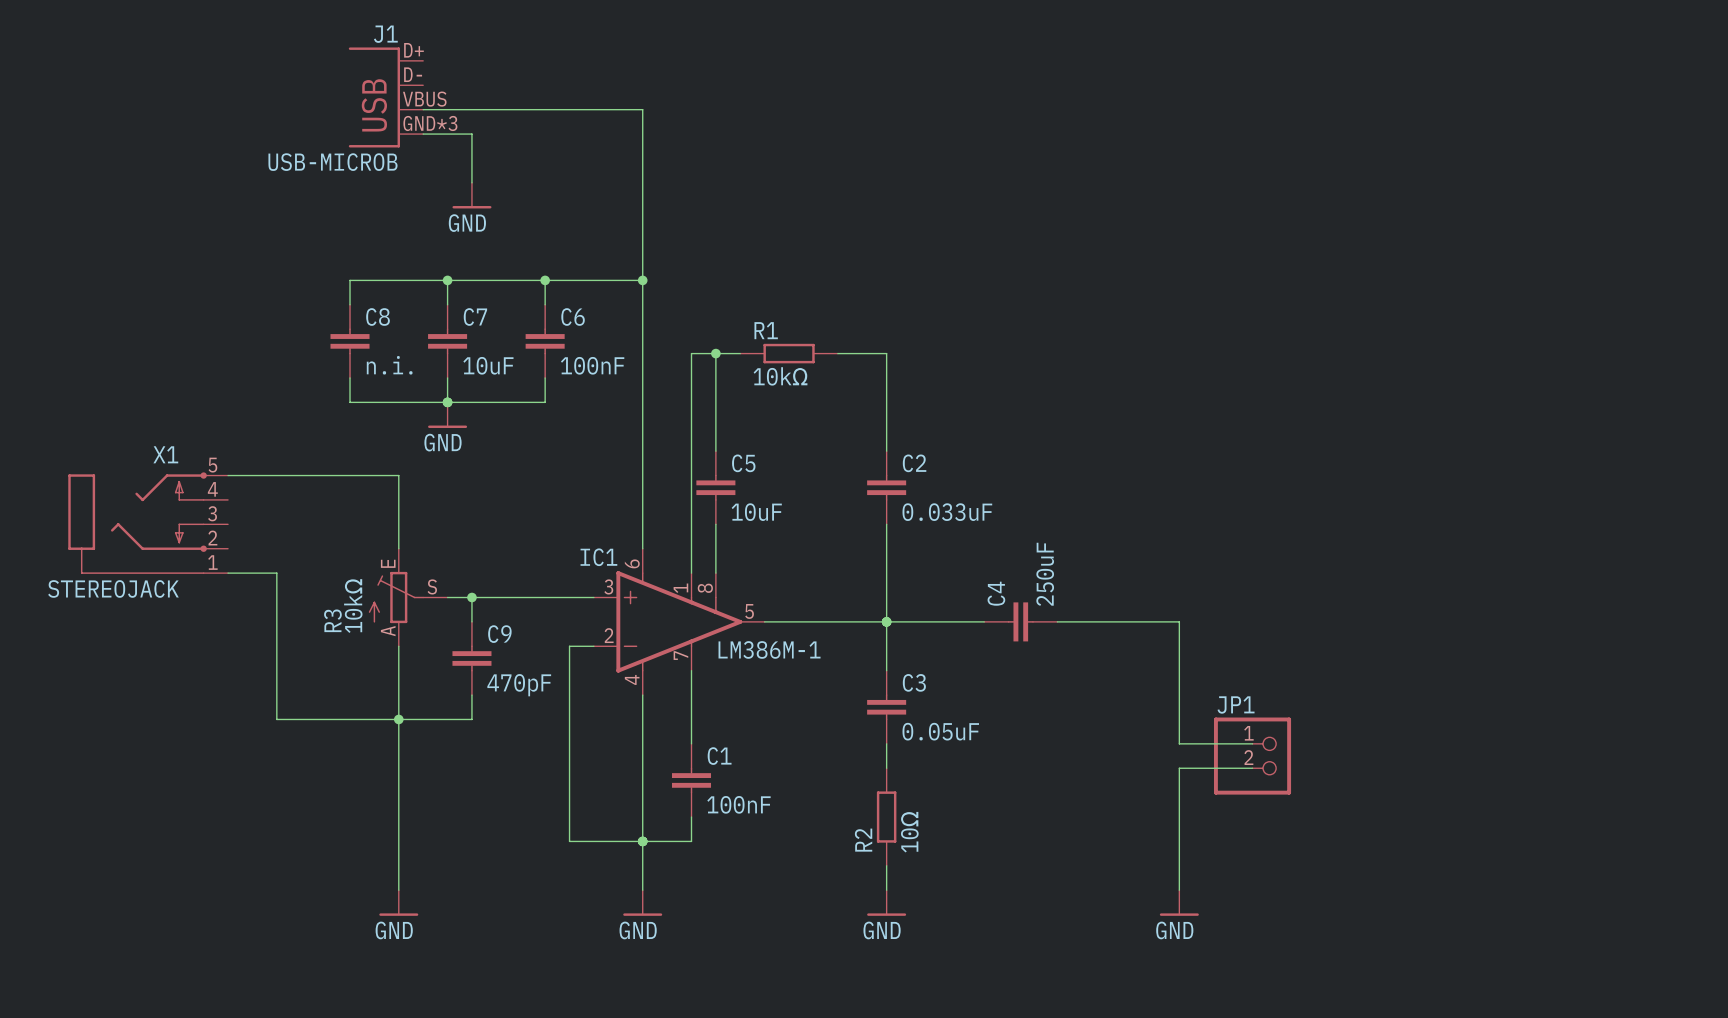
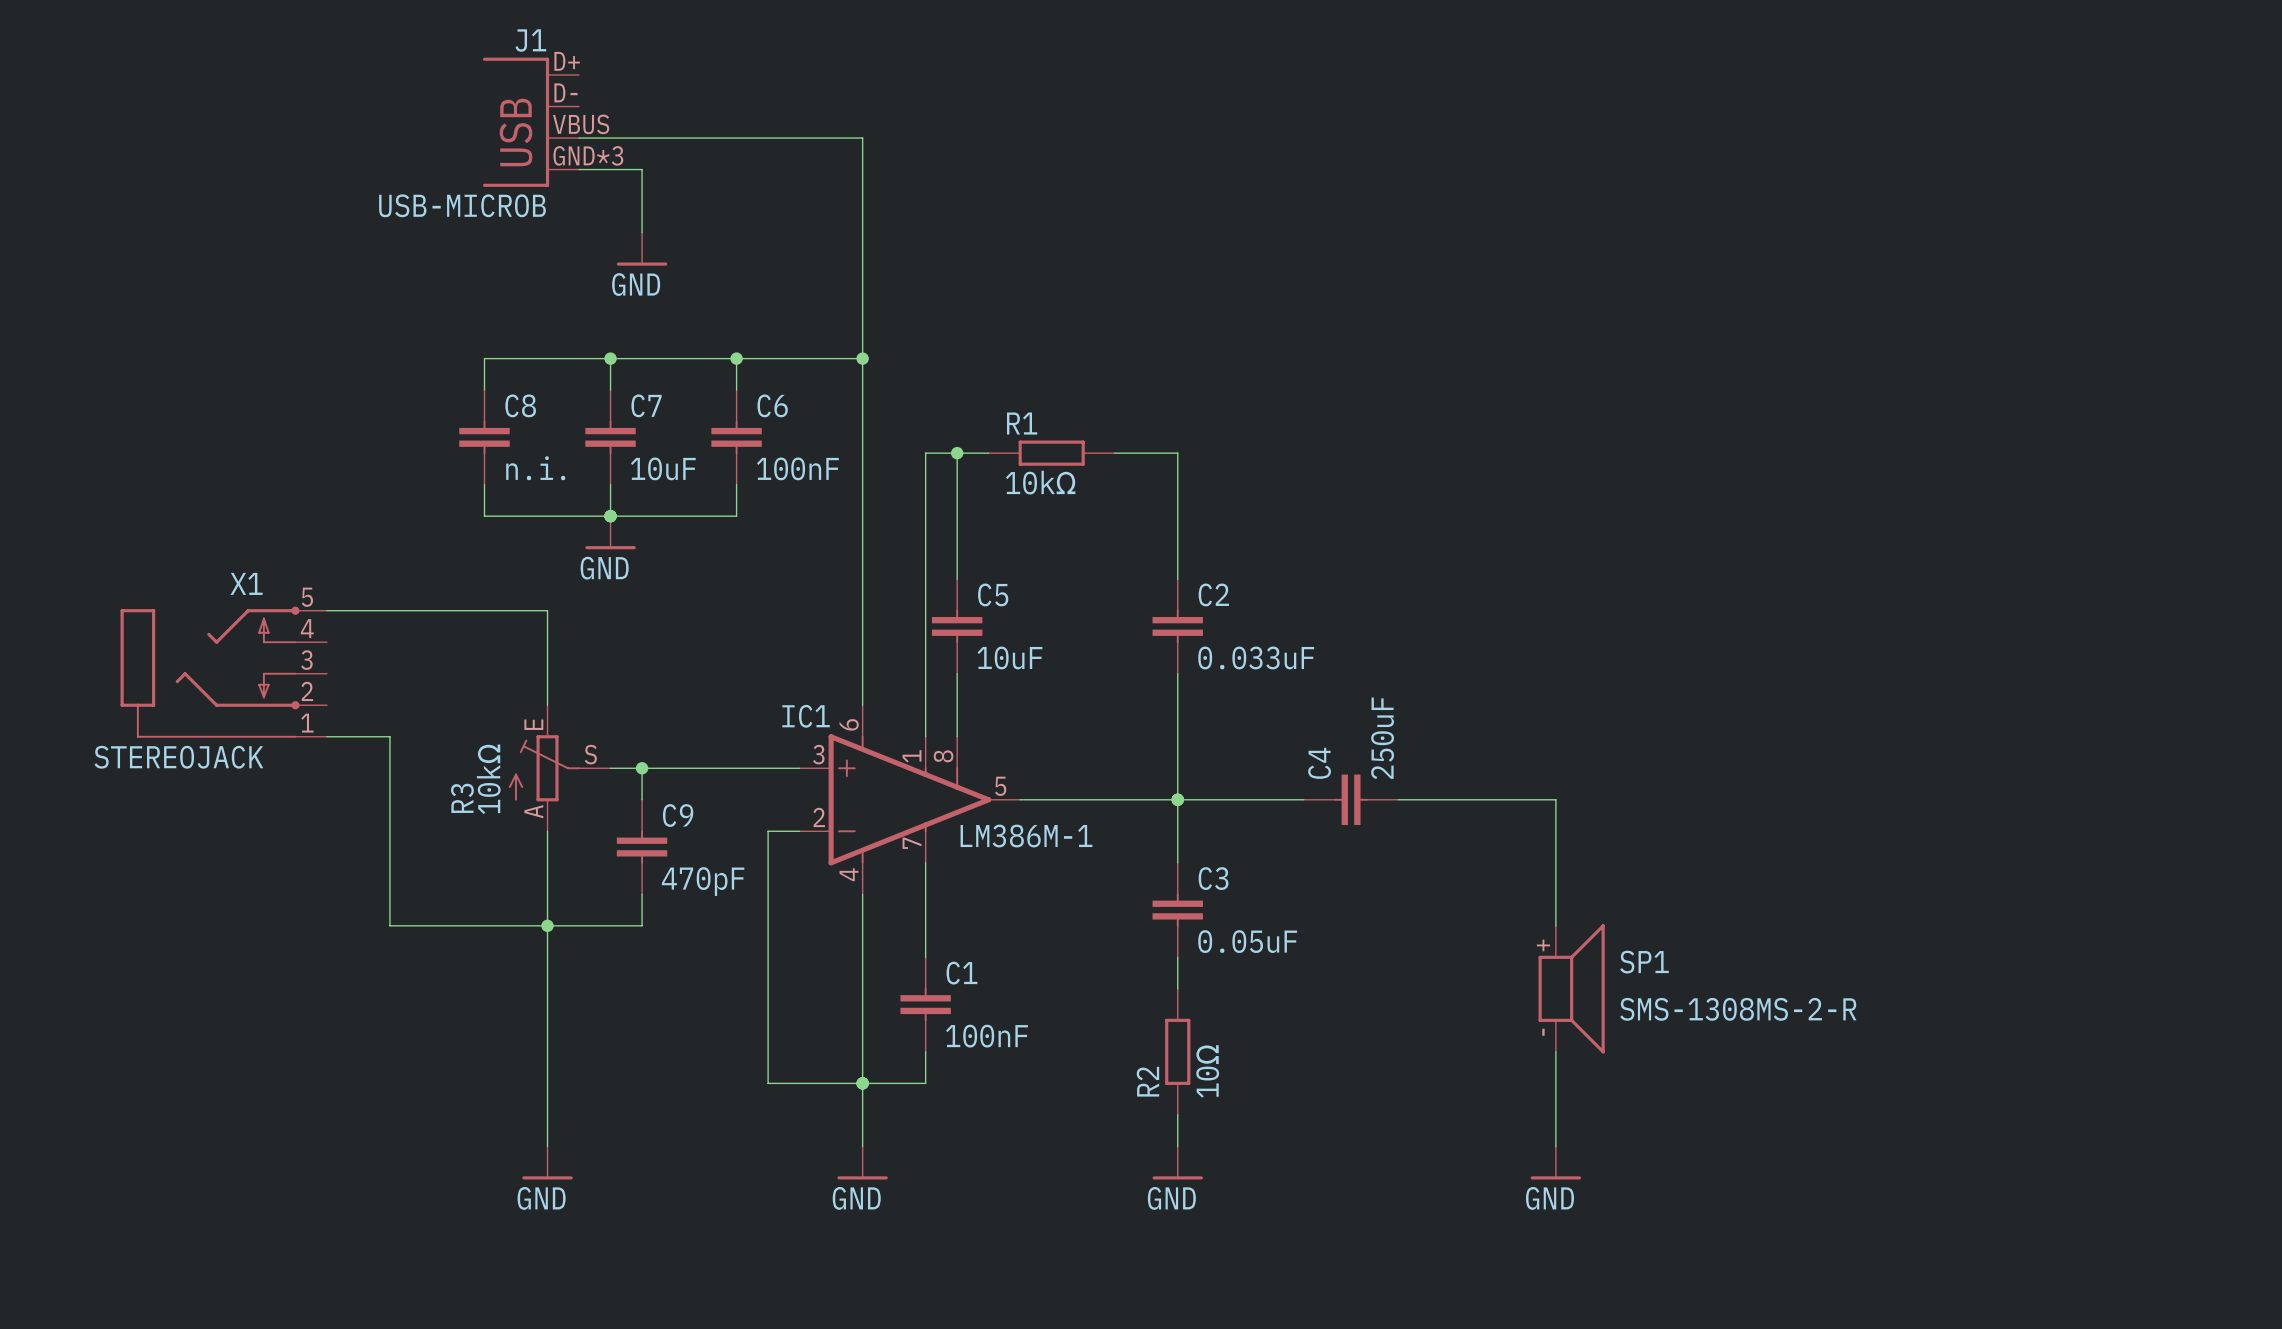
wire: (1179, 719) (1179, 743) (1252, 743) -> none
JP1: (1252, 756) -> none
SP1: none -> SMS-1308MS-2-R (1571, 988)
wire: (1252, 768) (1179, 768) (1179, 817) -> none

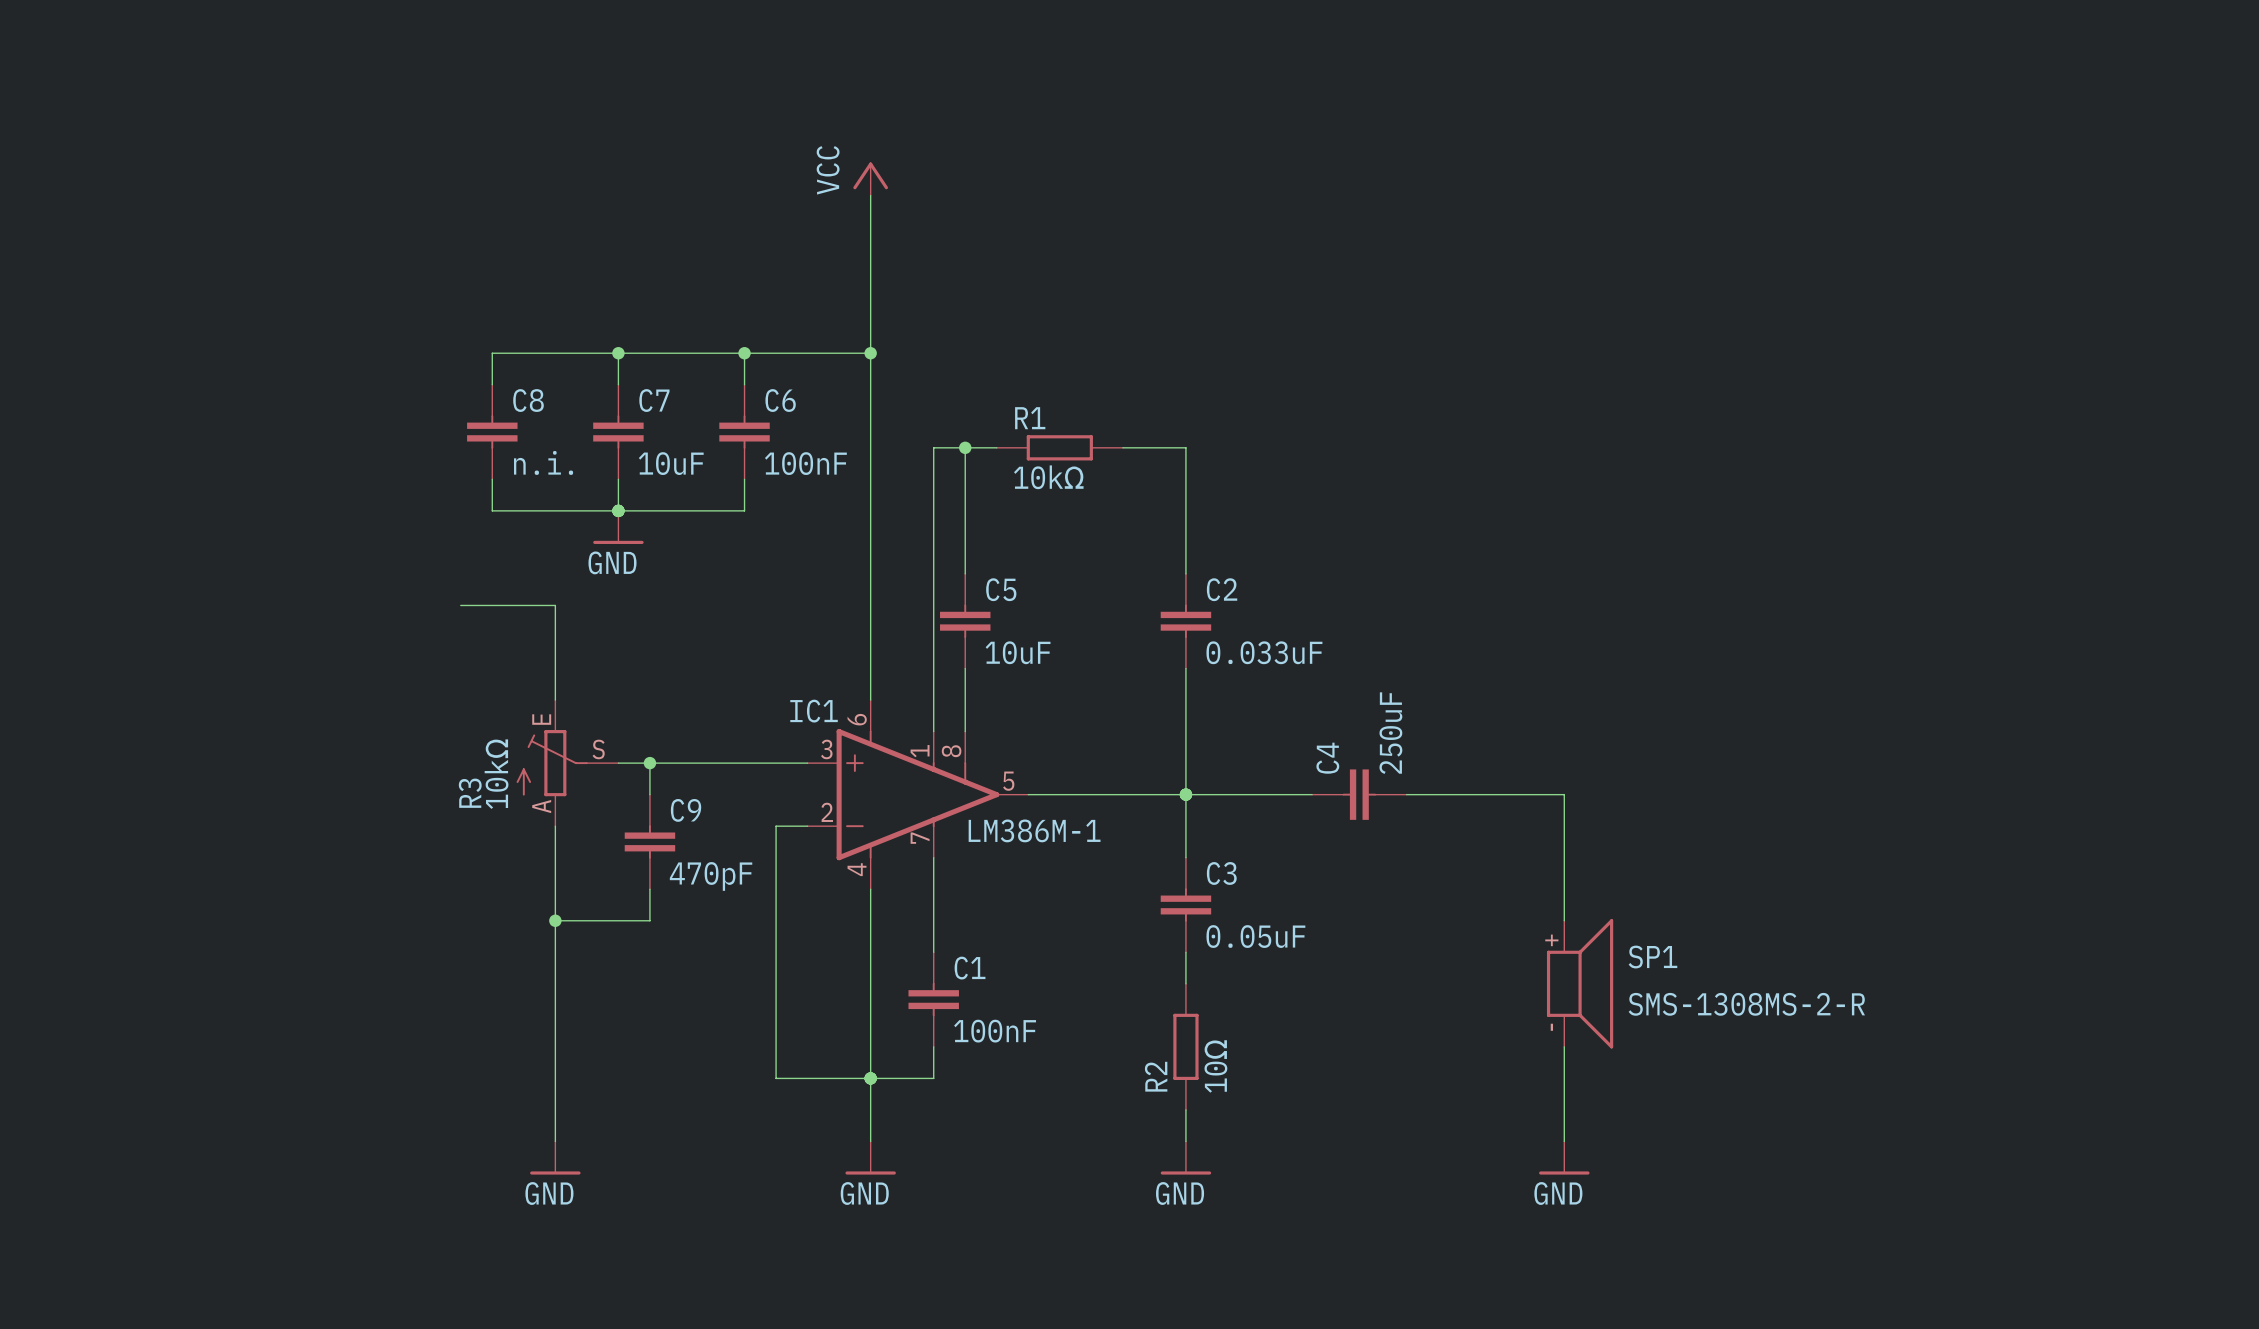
J1: USB-MICROB (530, 122) -> none
wire: (579, 138) (862, 138) (862, 201) -> none
wire: (579, 169) (642, 169) (642, 232) -> none
power symbol: none -> VCC (870, 179)
power symbol: GND (642, 249) -> none
wire: (326, 610) (452, 610) -> none
X1: STEREOJACK (223, 672) -> none
wire: (326, 736) (389, 736) (389, 925) (547, 925) -> none

